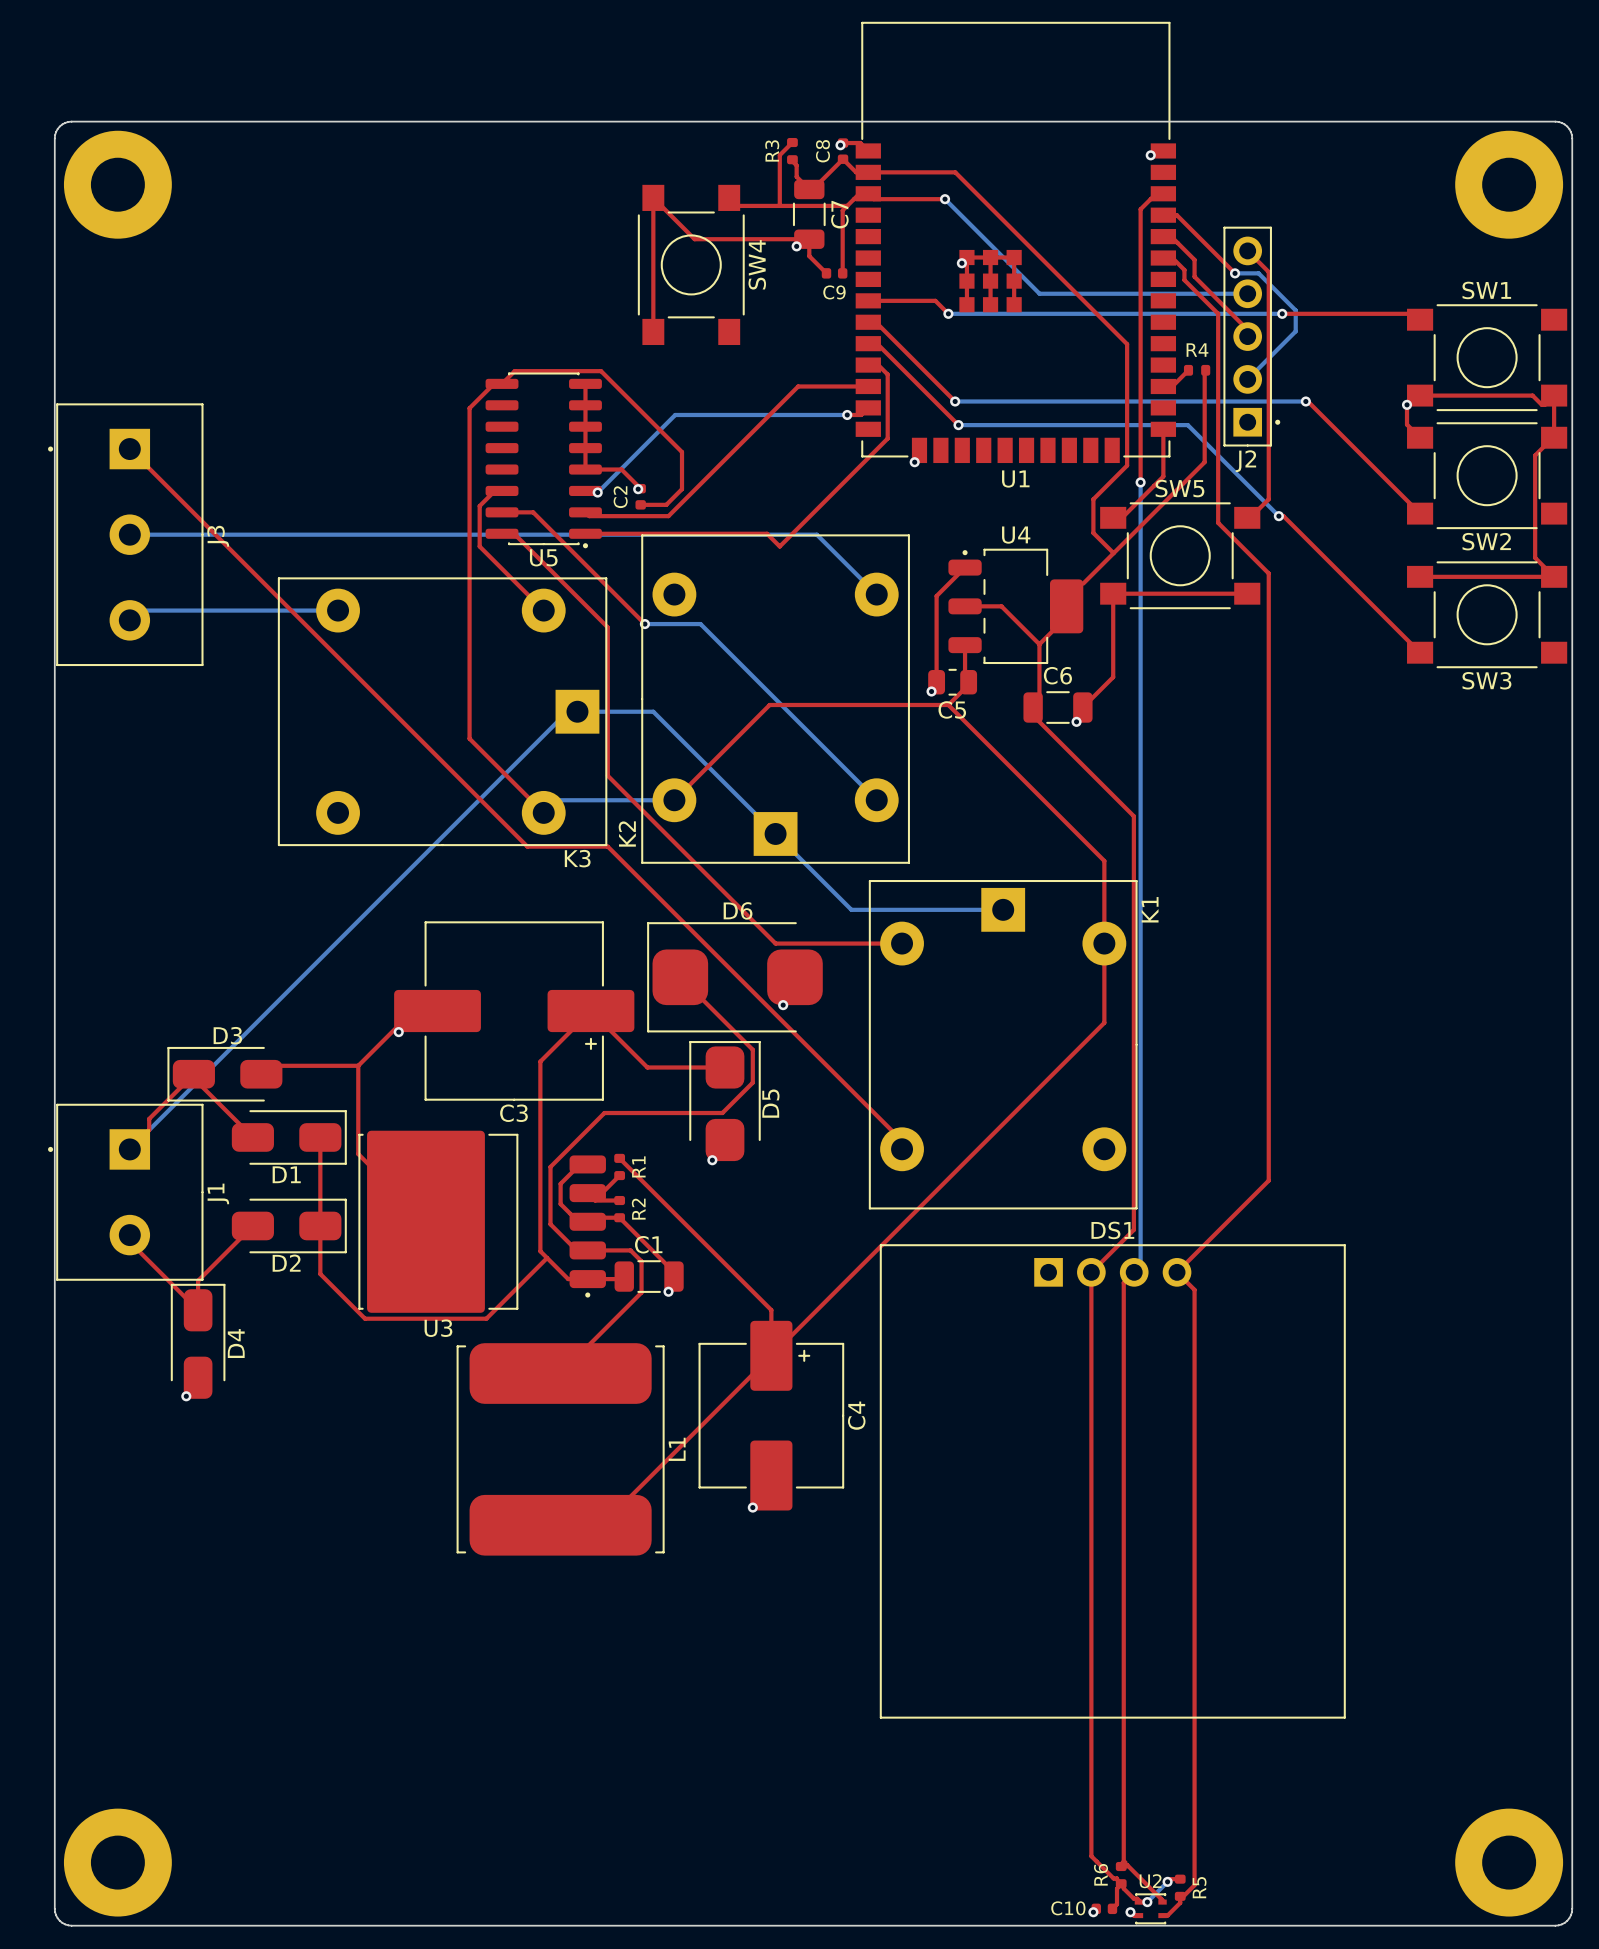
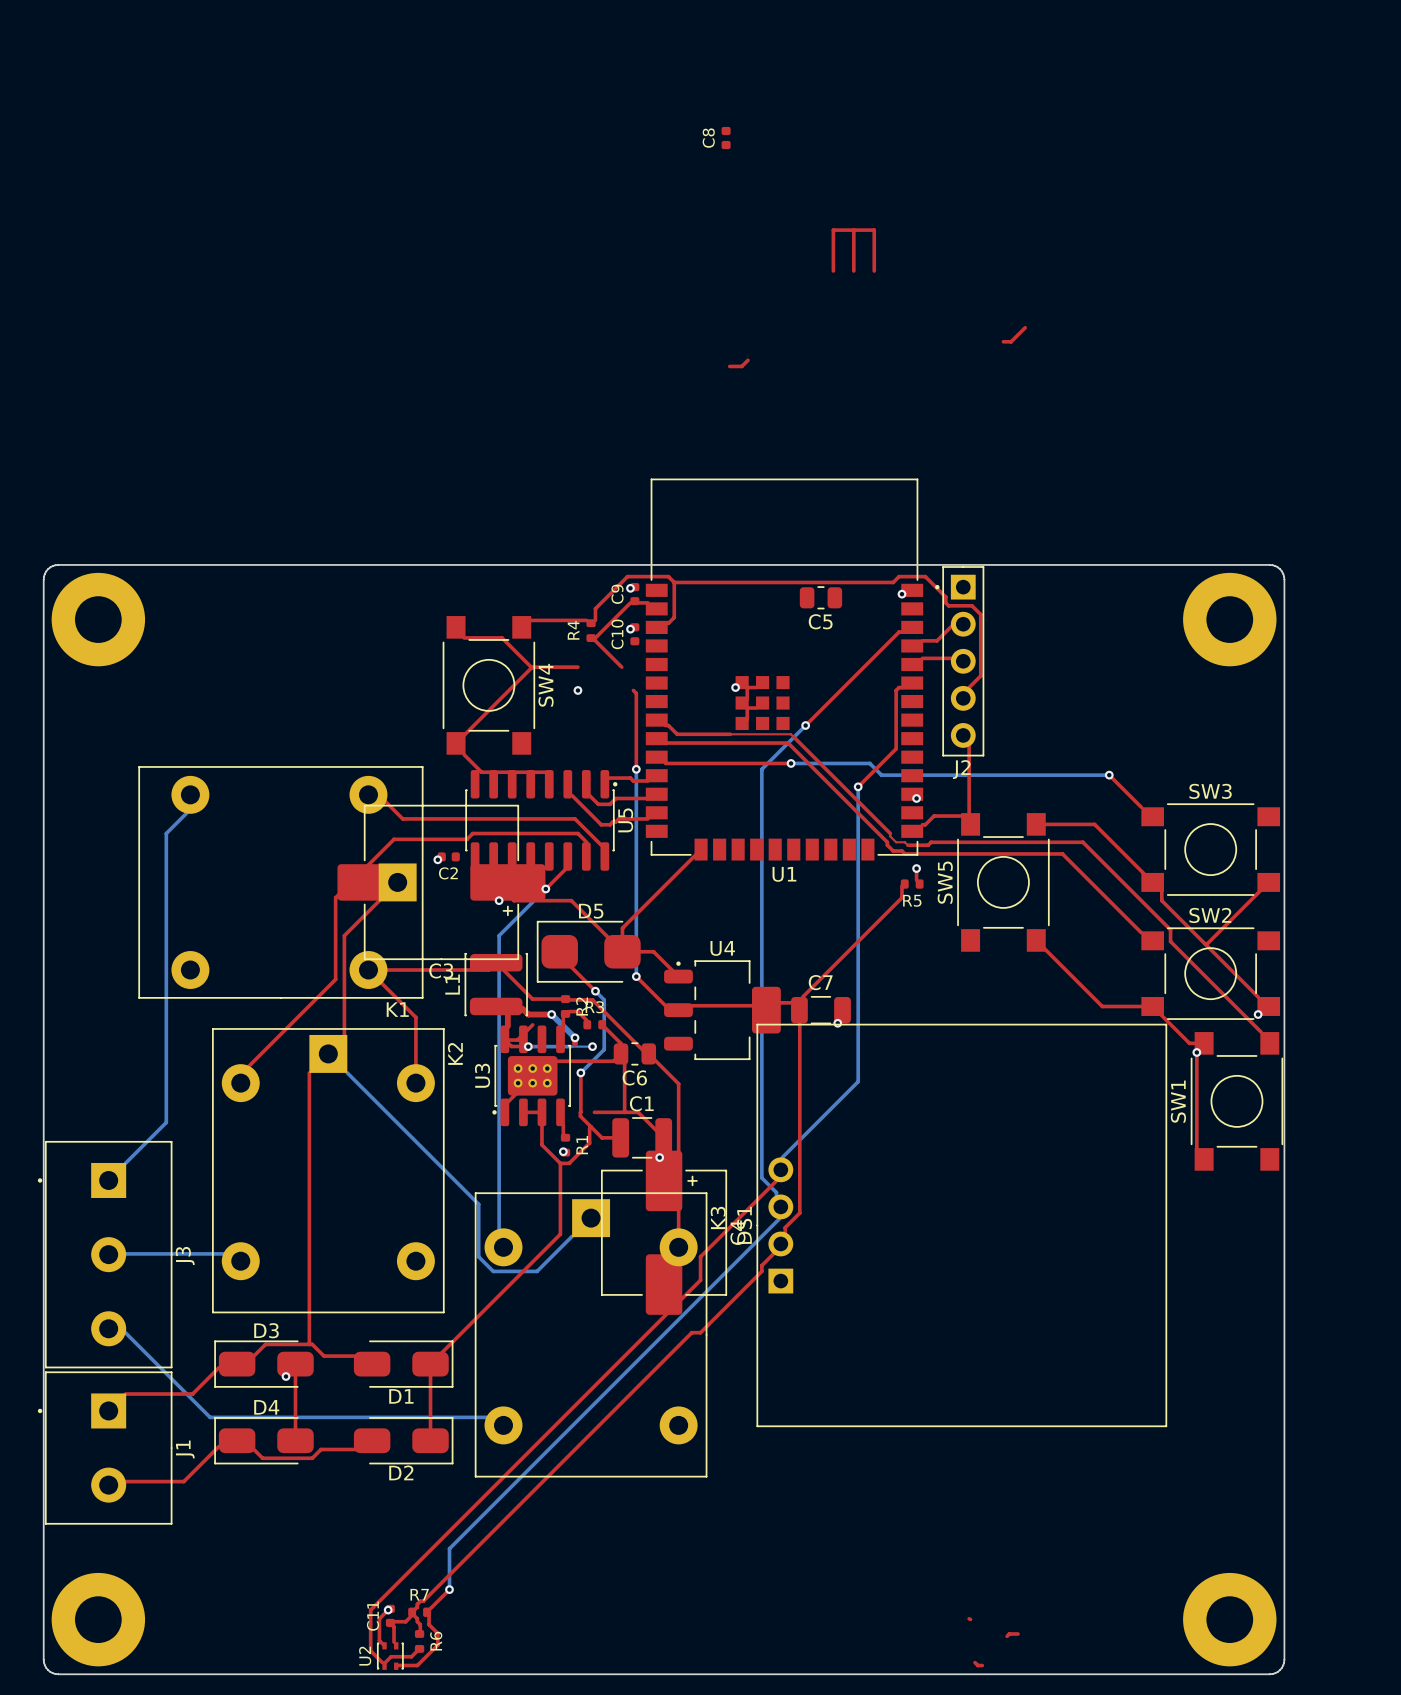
top track: (792, 142) (779, 155) (779, 205) -> none
top track: (843, 143) (860, 143) (868, 150) -> none
via: (840, 145) -> none
R3 rotation: 0° (792, 151) -> 90° clockwise (594, 1024)
R3 position: (792, 151) -> (594, 1024)
via: (1150, 155) -> none
top track: (792, 159) (796, 165) (796, 176) (809, 189) (812, 189) (843, 159) (856, 172) (955, 172) (1127, 344) (1127, 465) (1093, 499) (1093, 533) (1113, 553) -> none
part: (117, 184) -> none
part: (1509, 184) -> none
top track: (1163, 193) (1156, 193) (1140, 209) (1140, 482) -> none
top track: (729, 197) (737, 205) (847, 205) -> none
top track: (945, 199) (873, 199) (868, 193) (859, 193) (842, 210) (842, 273) -> none
bottom track: (945, 199) (1039, 293) (1247, 293) -> none
via: (945, 199) -> none
C7 rotation: 0° (809, 214) -> 90° clockwise (820, 1010)
C7 position: (809, 214) -> (820, 1010)
C7 name position: C7 (839, 214) -> C7 (820, 982)
top track: (1163, 215) (1176, 215) (1235, 273) -> none
top track: (1163, 236) (1171, 236) (1194, 259) (1194, 276) (1247, 329) (1247, 336) -> none
U1 position: (1015, 242) -> (784, 669)
via: (796, 246) -> none
top track: (1247, 250) (1268, 272) (1268, 499) (1250, 517) (1247, 517) -> none
top track: (1163, 258) (1172, 258) (1184, 269) (1184, 280) (1218, 313) (1218, 522) (1268, 573) (1268, 1180) (1177, 1272) (1194, 1289) (1194, 1885) (1183, 1896) (1180, 1896) (1180, 1902) (1167, 1915) (1162, 1915) -> none
via: (961, 263) -> none
SW4 position: (691, 264) -> (488, 685)
top track: (826, 273) (809, 256) (809, 239) (694, 239) (653, 197) (653, 331) -> none
C9 rotation: 0° (834, 273) -> 90° clockwise (634, 594)
C9 position: (834, 273) -> (634, 594)
bottom track: (1235, 273) (1258, 273) (1295, 310) (1295, 331) (1247, 379) -> none
via: (1235, 273) -> none
SW1 name position: SW1 (1486, 290) -> SW1 (1178, 1101)
top track: (868, 300) (935, 300) (948, 313) -> none
bottom track: (948, 313) (1282, 313) -> none
via: (948, 313) -> none
top track: (1282, 313) (1414, 313) (1420, 319) -> none
via: (1282, 313) -> none
top track: (868, 322) (875, 322) (955, 401) -> none
J2 rotation: 0° (1251, 336) -> 180° (959, 661)
J2 position: (1251, 336) -> (959, 661)
top track: (868, 343) (877, 343) (958, 425) -> none
SW1 rotation: 0° (1487, 357) -> 90° clockwise (1236, 1101)
SW1 position: (1487, 357) -> (1236, 1101)
top track: (868, 365) (878, 365) (887, 374) (887, 438) (779, 546) (767, 533) (585, 533) -> none
R4 rotation: 0° (1197, 370) -> 90° clockwise (591, 630)
R4 position: (1197, 370) -> (591, 630)
top track: (1204, 374) (1204, 462) (1083, 583) -> none
top track: (585, 383) (585, 469) (621, 469) (640, 488) -> none
top track: (868, 386) (798, 386) (668, 516) (589, 516) (585, 512) -> none
bottom track: (955, 401) (1305, 401) -> none
via: (955, 401) -> none
top track: (1305, 401) (1420, 513) -> none
via: (1305, 401) -> none
via: (1407, 404) -> none
bottom track: (847, 414) (675, 414) (597, 492) -> none
via: (847, 414) -> none
bottom track: (958, 425) (1187, 425) (1278, 516) -> none
via: (958, 425) -> none
top track: (1163, 429) (1163, 476) (1122, 517) (1113, 517) -> none
top track: (1420, 437) (1407, 424) (1407, 404) (1416, 395) (1532, 395) (1541, 404) (1544, 404) (1554, 395) (1554, 437) (1535, 455) (1535, 557) (1554, 576) (1420, 576) -> none
top track: (129, 449) (527, 846) (607, 846) (902, 1140) (902, 1149) -> none
U5 rotation: 0° (543, 460) -> 90° counterclockwise (541, 820)
U5 position: (543, 460) -> (541, 820)
via: (914, 462) -> none
SW2 position: (1487, 475) -> (1210, 973)
bottom track: (1140, 482) (1140, 1265) (1134, 1272) -> none
via: (1140, 482) -> none
SW5 name position: SW5 (1179, 488) -> SW5 (945, 882)
via: (638, 489) -> none
top track: (502, 490) (494, 490) (479, 506) (479, 546) (543, 610) -> none
via: (597, 492) -> none
C2 rotation: 0° (640, 496) -> 90° clockwise (448, 856)
C2 position: (640, 496) -> (448, 856)
top track: (640, 504) (666, 504) (682, 489) (682, 452) (601, 371) (514, 371) (502, 383) (493, 383) (469, 408) (469, 738) (543, 812) -> none
top track: (502, 512) (533, 512) (644, 624) -> none
top track: (1278, 516) (1283, 516) (1420, 652) -> none
via: (1278, 516) -> none
top track: (502, 533) (514, 533) (607, 627) (607, 775) (775, 943) (902, 943) -> none
J3 position: (125, 534) -> (105, 1254)
bottom track: (129, 534) (816, 534) (876, 594) -> none
SW2 name position: SW2 (1486, 541) -> SW2 (1210, 915)
SW5 rotation: 0° (1180, 555) -> 90° clockwise (1003, 882)
SW5 position: (1180, 555) -> (1003, 882)
top track: (965, 567) (936, 596) (936, 682) -> none
top track: (1247, 593) (1113, 593) (1113, 677) (1082, 707) -> none
top track: (965, 606) (1001, 606) (1039, 644) -> none
U4 position: (1015, 606) -> (722, 1010)
bottom track: (338, 610) (139, 610) (129, 620) -> none
SW3 position: (1487, 614) -> (1210, 849)
bottom track: (644, 624) (700, 624) (876, 800) -> none
via: (644, 624) -> none
top track: (1052, 630) (1039, 644) -> none
top track: (1039, 644) (1039, 694) -> none
top track: (965, 645) (965, 678) (968, 684) (948, 704) -> none
board edge: (54, 661) (54, 138) (57, 129) (65, 122) (1555, 121) (1567, 126) (1572, 138) (1572, 1908) (1567, 1920) (1558, 1925) (1471, 1925) -> (43, 579) (47, 569) (58, 564) (1269, 564) (1280, 569) (1284, 579) (1284, 1659) (1280, 1670) (1269, 1674)
top track: none -> (674, 582) (674, 617) (668, 623) (665, 623)
top track: none -> (674, 582) (668, 576) (627, 576) (595, 608) (595, 620)
top track: none -> (674, 582) (893, 582) (899, 576) (925, 576) (945, 597) (945, 602) (948, 605) (972, 605) (980, 614) (980, 675) (969, 687)
via: none -> (630, 588)
C6 name position: C6 (1057, 675) -> C6 (634, 1077)
SW3 name position: SW3 (1486, 680) -> SW3 (1210, 791)
top track: none -> (630, 602) (595, 637)
top track: none -> (639, 602) (648, 602)
via: (931, 691) -> none
C6 footprint: [1023, 691, 1093, 724] -> [613, 1042, 657, 1066]
K2 rotation: 0° (775, 699) -> 180° (328, 1170)
K2 position: (775, 699) -> (328, 1170)
top track: (948, 704) (769, 704) (674, 800) -> none
top track: (948, 704) (1104, 860) (1104, 1022) (601, 1525) (560, 1525) -> none
part: none -> (98, 619)
top track: (1033, 707) (1033, 715) (1133, 816) (1133, 1229) (1091, 1272) (1091, 1856) (1113, 1878) (1117, 1878) (1133, 1898) (1137, 1898) (1138, 1902) (1147, 1902) -> none
part: none -> (1229, 619)
top track: none -> (531, 620) (586, 620)
K3 rotation: 0° (442, 711) -> 90° counterclockwise (591, 1334)
K3 position: (442, 711) -> (591, 1334)
top track: none -> (951, 626) (937, 640) (922, 640)
via: none -> (630, 629)
top track: none -> (901, 632) (899, 632) (805, 725)
via position: (1076, 721) -> (901, 594)
top track: none -> (464, 637) (502, 637) (531, 667)
top track: none -> (595, 640) (621, 667)
top track: none -> (922, 658) (951, 658)
top track: none -> (531, 667) (577, 667)
top track: none -> (531, 667) (456, 743)
via: none -> (735, 687)
top track: none -> (756, 687) (747, 687) (747, 699)
top track: none -> (901, 687) (896, 690) (896, 748) (858, 786)
via: none -> (577, 690)
top track: none -> (633, 690) (636, 693) (636, 769)
bottom track: (674, 800) (556, 800) (543, 812) -> none
top track: none -> (756, 708) (747, 708) (747, 719)
top track: none -> (665, 725) (668, 725) (677, 734) (791, 734) (890, 833) (890, 836) (896, 842) (904, 842) (907, 845) (928, 845) (931, 842) (1082, 842) (1170, 929) (1170, 941) (1261, 1032)
bottom track: none -> (805, 725) (761, 769) (761, 1178) (776, 1192) (776, 1195)
via: none -> (805, 725)
top track: none -> (665, 743) (788, 743) (887, 842) (887, 845) (893, 851) (901, 851) (904, 853) (1062, 853) (1141, 932)
top track: none -> (969, 745) (969, 813)
top track: none -> (464, 754) (481, 772) (545, 772)
top track: none -> (665, 763) (791, 763)
bottom track: none -> (791, 763) (869, 763) (881, 775) (1109, 775)
via: none -> (791, 763)
bottom track: none -> (636, 769) (636, 976)
via: none -> (636, 769)
top track: none -> (1109, 775) (1141, 807)
via: none -> (1109, 775)
top track: none -> (607, 778) (630, 778) (633, 780) (648, 780)
bottom track: none -> (858, 786) (858, 1081) (782, 1157)
via: none -> (858, 786)
bottom track: (1003, 909) (851, 909) (653, 711) (567, 711) (129, 1149) -> none
top track: none -> (572, 795) (601, 824) (610, 824) (618, 818) (648, 818)
top track: none -> (589, 795) (598, 804) (610, 804) (615, 798) (648, 798)
via: none -> (916, 798)
top track: none -> (385, 801) (402, 818) (575, 818) (601, 845)
bottom track: none -> (186, 813) (166, 833) (166, 1122) (125, 1163)
top track: none -> (963, 816) (934, 816) (925, 824) (922, 824)
top track: none -> (1036, 824) (1094, 824) (1152, 882)
top track: none -> (586, 842) (577, 833) (472, 833) (467, 839) (394, 839) (335, 897) (335, 979) (248, 1067)
top track: none -> (701, 849) (622, 928) (622, 951)
top track: (680, 977) (752, 1049) (752, 1082) (722, 1113) (604, 1113) (550, 1166) (550, 1224) (576, 1250) (630, 1250) (641, 1261) (641, 1292) (560, 1373) -> none
D6: (734, 977) -> none
via: none -> (437, 859)
top track: none -> (566, 868) (545, 888)
top track: none -> (916, 868) (916, 880)
via: none -> (916, 868)
via: (783, 1005) -> none
top track: none -> (1268, 882) (1205, 944)
top track: none -> (901, 886) (901, 897) (802, 997)
bottom track: none -> (545, 888) (499, 935) (499, 1230)
via: none -> (545, 888)
top track: none -> (1161, 891) (1161, 900) (1258, 997)
top track: none -> (507, 893) (514, 900) (571, 900) (622, 951)
top track: (395, 1028) (358, 1065) -> none
via: (398, 1032) -> none
top track: none -> (379, 900) (344, 935) (344, 1034)
via: none -> (499, 900)
K1 rotation: 0° (1003, 1044) -> 90° clockwise (280, 882)
K1 position: (1003, 1044) -> (280, 882)
top track: (280, 1065) (358, 1065) -> none
top track: (358, 1065) (358, 1154) (425, 1221) -> none
top track: (725, 1067) (647, 1067) (590, 1011) (540, 1061) (540, 1251) (568, 1279) (621, 1279) (624, 1276) -> none
D3 position: (224, 1074) -> (263, 1364)
top track: none -> (1036, 940) (1102, 1006) (1152, 1006) (1189, 1043) (1204, 1043) (1196, 1052) (1196, 1152) (1204, 1159)
top track: none -> (559, 951) (559, 955) (595, 991)
top track: none -> (622, 951) (653, 951) (678, 976)
D5 rotation: 0° (725, 1101) -> 90° counterclockwise (588, 951)
top track: none -> (636, 976) (665, 1005)
via: none -> (636, 976)
U3 footprint: [358, 1130, 606, 1313] -> [492, 1025, 571, 1127]
bottom track: none -> (595, 991) (604, 999) (604, 1049) (580, 1072)
via: none -> (595, 991)
top track: (252, 1137) (193, 1078) (193, 1074) (149, 1118) (149, 1129) (129, 1149) -> none
D1 position: (289, 1137) -> (403, 1364)
top track: (320, 1137) (320, 1274) (365, 1318) (486, 1318) (547, 1258) -> none
top track: none -> (779, 1002) (791, 1002)
top track: none -> (691, 1005) (753, 1005)
top track: none -> (522, 1008) (528, 1014) (551, 1014)
top track: (619, 1158) (771, 1310) (771, 1355) -> none
top track: none -> (569, 1011) (577, 1011) (586, 1020)
via: (712, 1160) -> none
top track: none -> (507, 1014) (507, 1026)
bottom track: none -> (551, 1014) (575, 1037)
via: none -> (551, 1014)
via: none -> (1258, 1014)
top track: (587, 1164) (580, 1164) (560, 1183) (560, 1204) (578, 1221) (587, 1221) (591, 1217) (619, 1217) (674, 1272) (674, 1276) -> none
R1 position: (619, 1166) -> (565, 1145)
top track: none -> (563, 1017) (563, 1026)
top track: none -> (799, 1023) (799, 1213) (785, 1227) (785, 1233)
via: none -> (837, 1023)
top track: none -> (602, 1024) (621, 1043) (621, 1053)
top track: none -> (575, 1037) (575, 1043)
via: none -> (575, 1037)
J1 position: (125, 1192) -> (105, 1448)
bottom track: none -> (528, 1046) (592, 1046)
via: none -> (528, 1046)
via: none -> (592, 1046)
via: none -> (1196, 1052)
R2 position: (619, 1209) -> (565, 1006)
top track: none -> (621, 1053) (624, 1057) (624, 1112)
top track: none -> (621, 1053) (613, 1061) (548, 1061) (504, 1105) (504, 1112)
top track: (252, 1225) (198, 1280) (198, 1310) (129, 1242) (129, 1235) -> none
D2 position: (289, 1225) -> (403, 1440)
top track: none -> (309, 1072) (309, 1344)
bottom track: none -> (347, 1072) (478, 1204) (478, 1256) (493, 1271) (537, 1271) (572, 1236)
top track: none -> (580, 1072) (580, 1116) (602, 1137) (620, 1137)
via: none -> (580, 1072)
top track: none -> (415, 1083) (415, 1017) (368, 970) (488, 970) (496, 962) (532, 999) (592, 999) (678, 1083) (678, 1247)
C1 footprint: [614, 1260, 684, 1293] -> [612, 1117, 673, 1159]
top track: (1134, 1272) (1123, 1282) (1123, 1861) (1121, 1866) (1127, 1865) -> none
top track: none -> (523, 1112) (541, 1112) (541, 1144) (560, 1163)
top track: none -> (594, 1112) (638, 1112) (663, 1137)
top track: none -> (563, 1125) (563, 1134)
via: (668, 1291) -> none
top track: none -> (591, 1126) (589, 1142) (569, 1163) (560, 1163)
via: none -> (563, 1151)
U3 name position: U3 (438, 1328) -> U3 (482, 1075)
via: none -> (659, 1157)
top track: none -> (560, 1163) (560, 1234) (430, 1364) (430, 1440)
D4 rotation: 0° (198, 1341) -> 90° counterclockwise (263, 1440)
D4 position: (198, 1341) -> (263, 1440)
L1 footprint: [456, 1343, 665, 1556] -> [464, 952, 528, 1017]
top track: none -> (776, 1180) (700, 1256) (700, 1280) (370, 1610) (370, 1650) (382, 1662)
via: (186, 1396) -> none
bottom track: none -> (779, 1218) (449, 1548) (449, 1589)
bottom track: none -> (125, 1253) (224, 1253)
top track: none -> (773, 1253) (761, 1265) (761, 1271) (700, 1332) (691, 1332) (423, 1601) (417, 1604) (414, 1610)
L1 name position: L1 (677, 1449) -> L1 (452, 984)
DS1 rotation: 0° (1112, 1481) -> 90° counterclockwise (961, 1225)
via: (752, 1507) -> none
bottom track: none -> (125, 1332) (210, 1417) (487, 1417)
top track: none -> (253, 1356) (265, 1344) (312, 1344) (323, 1356) (356, 1356)
top track: none -> (295, 1364) (295, 1440)
top track: none -> (218, 1367) (192, 1394) (125, 1394)
via: none -> (286, 1376)
top track: none -> (218, 1446) (183, 1481) (125, 1481)
top track: none -> (253, 1449) (262, 1458) (312, 1458) (321, 1449) (356, 1449)
top track: none -> (449, 1589) (429, 1610)
via: none -> (449, 1589)
top track: none -> (390, 1608) (379, 1618) (379, 1640) (384, 1645)
via: none -> (388, 1610)
R7: none -> (419, 1612)
C11: none -> (390, 1615)
top track: none -> (411, 1615) (405, 1621) (394, 1621)
top track: none -> (414, 1615) (420, 1624) (420, 1630)
top track: none -> (429, 1615) (429, 1624) (437, 1633) (437, 1645) (417, 1665) (396, 1665)
part position: (1509, 1862) -> (1229, 1619)
top track: (1127, 1865) (1162, 1902) -> none
top track: none -> (393, 1626) (394, 1642)
R6 name position: R6 (1101, 1874) -> R6 (436, 1641)
R6 position: (1121, 1875) -> (419, 1641)
U2 name position: U2 (1150, 1881) -> U2 (365, 1656)
bottom track: (1167, 1881) (1147, 1902) -> none
via: (1167, 1881) -> none
top track: (1121, 1883) (1117, 1888) (1117, 1904) (1112, 1908) -> none
R5 rotation: 0° (1180, 1887) -> 90° clockwise (912, 884)
R5 position: (1180, 1887) -> (912, 884)
top track: none -> (417, 1650) (411, 1656) (391, 1656) (385, 1662)
via: (1147, 1902) -> none
C10 rotation: 0° (1104, 1908) -> 90° clockwise (634, 634)
C10 position: (1104, 1908) -> (634, 634)
U2 rotation: 0° (1150, 1908) -> 90° clockwise (390, 1656)
U2 position: (1150, 1908) -> (390, 1656)
via: (1093, 1912) -> none
via: (1130, 1912) -> none

